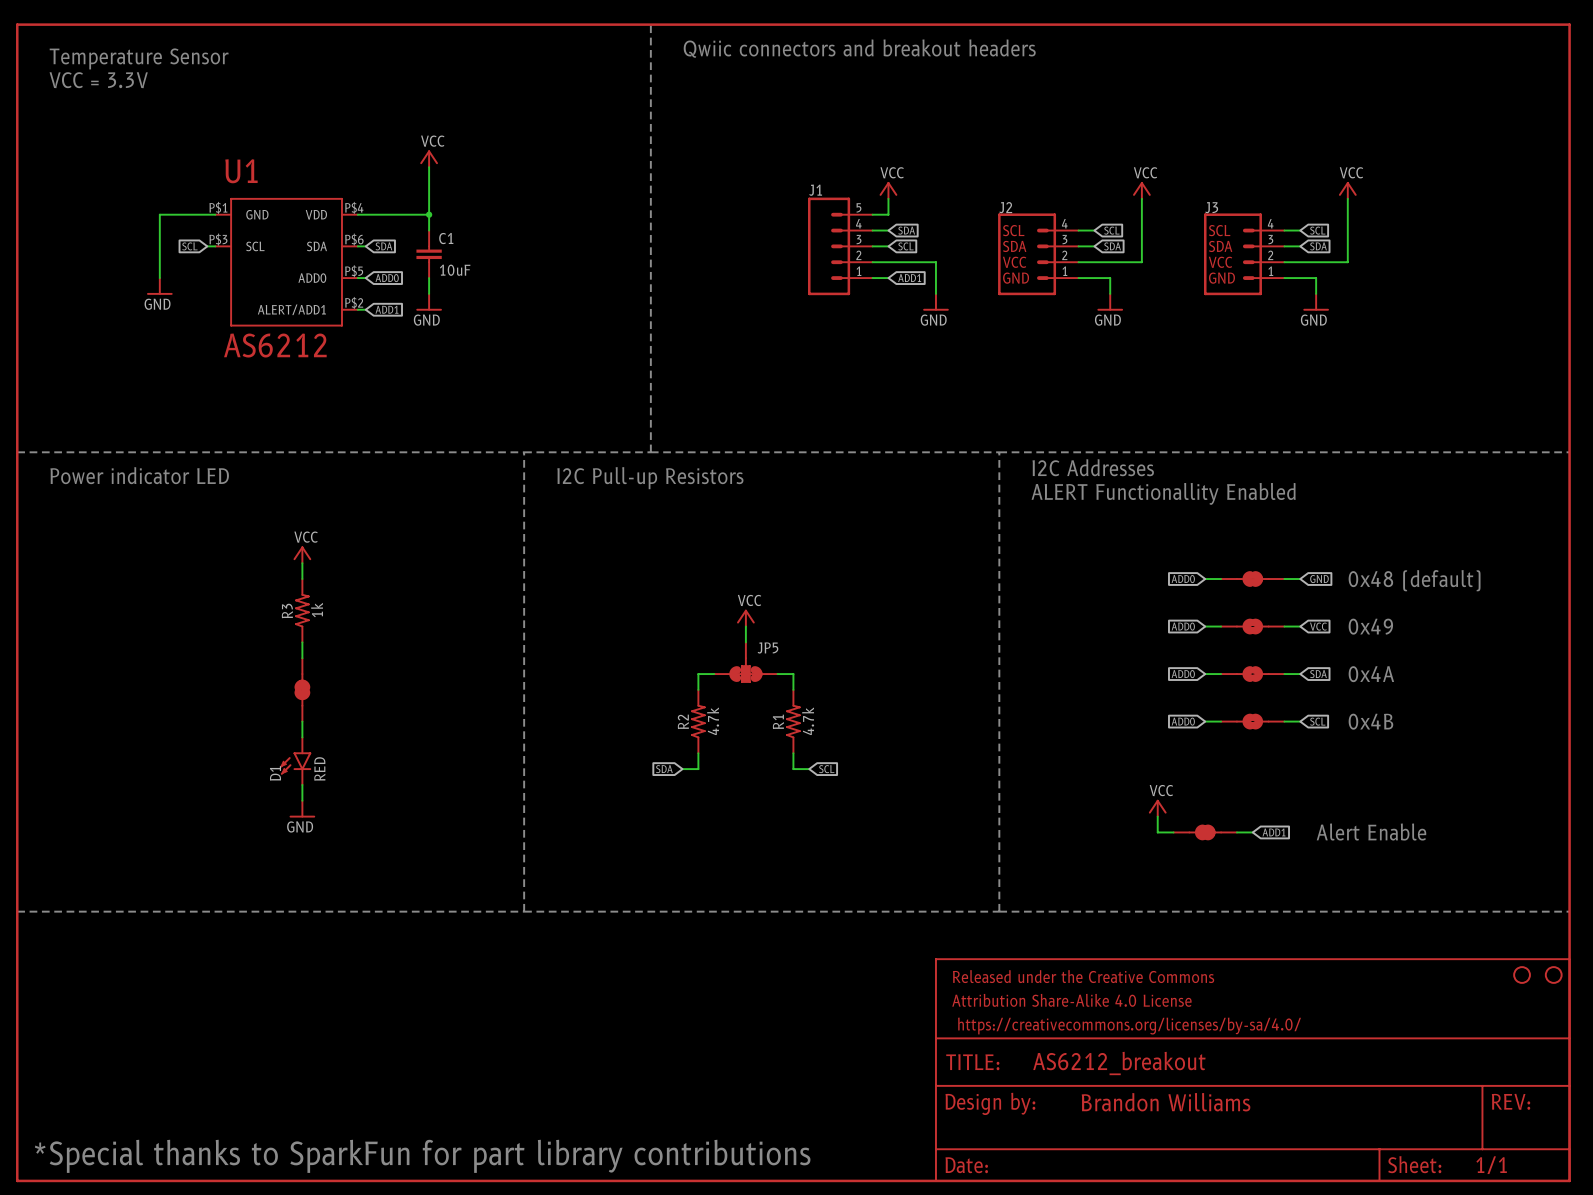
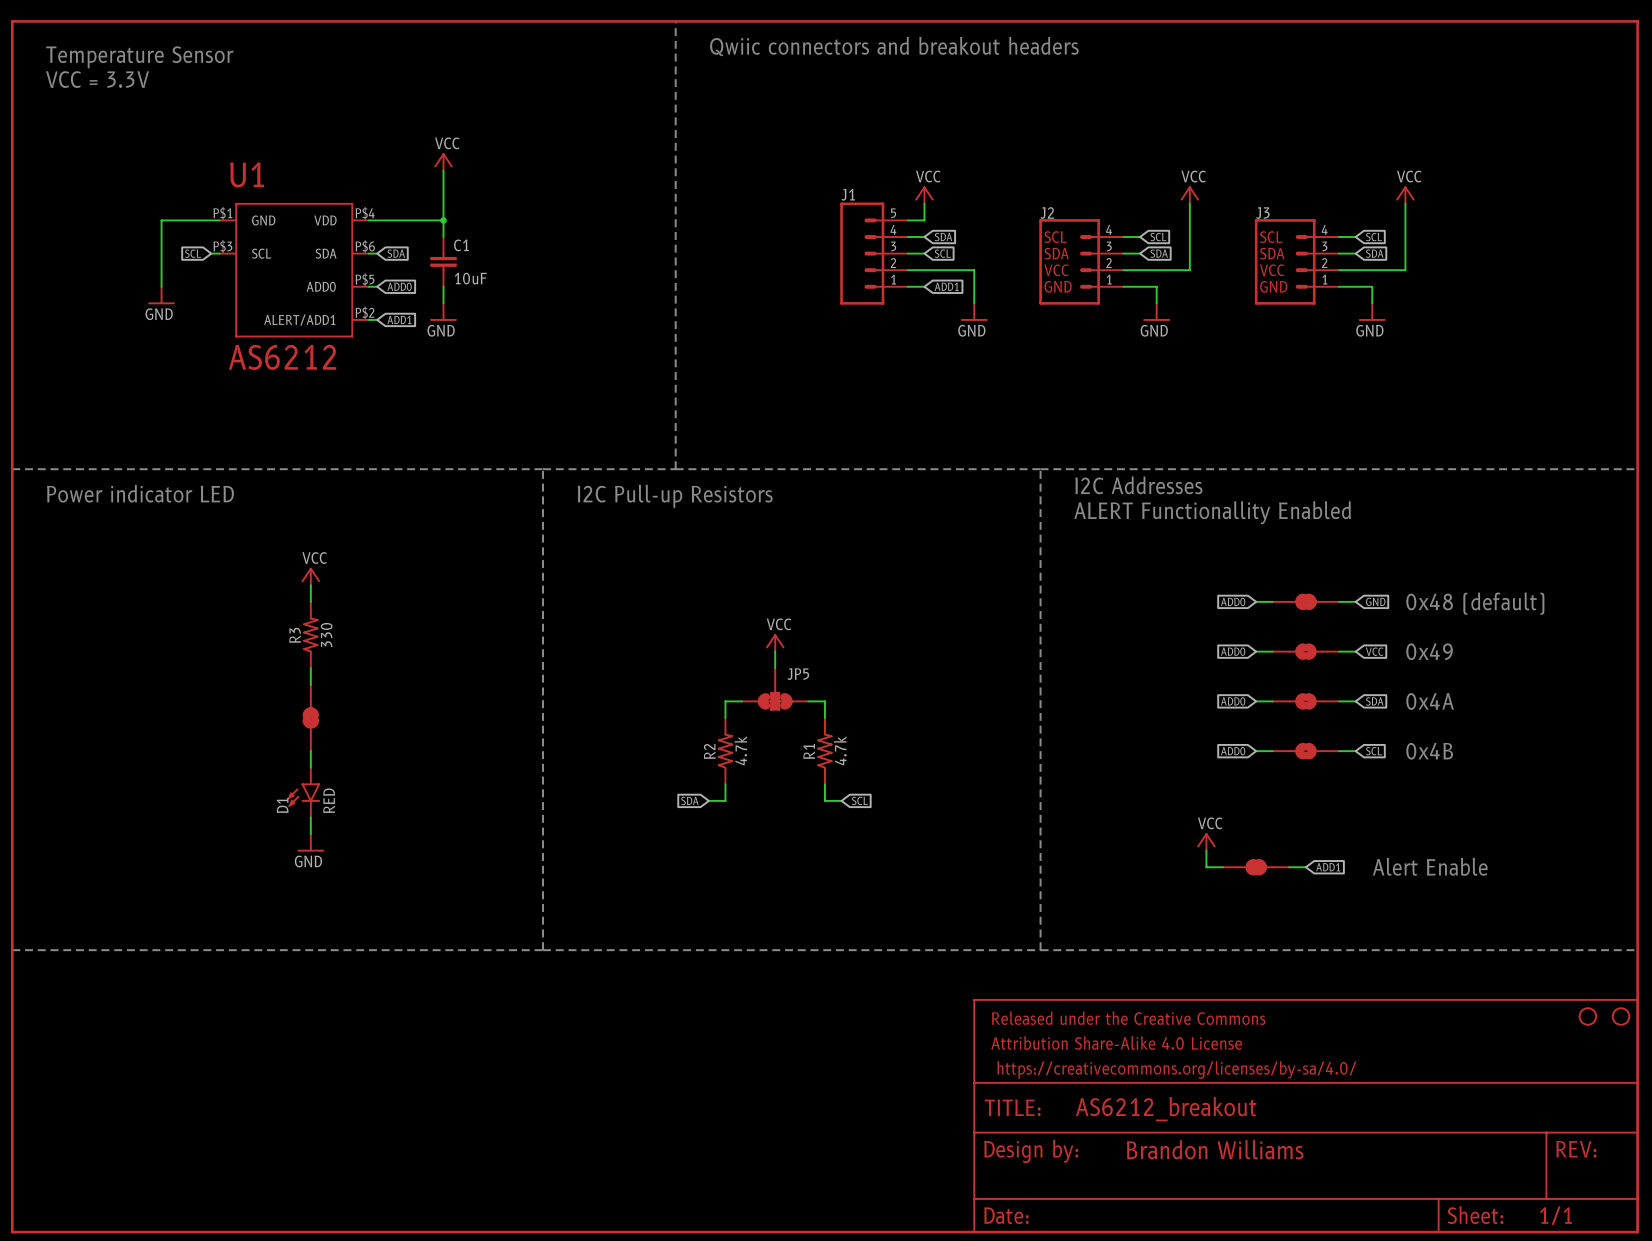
R3 value: 1k (317, 610) -> 330 (326, 635)
text: *Special thanks to SparkFun for part library contributions (422, 1156) -> none

